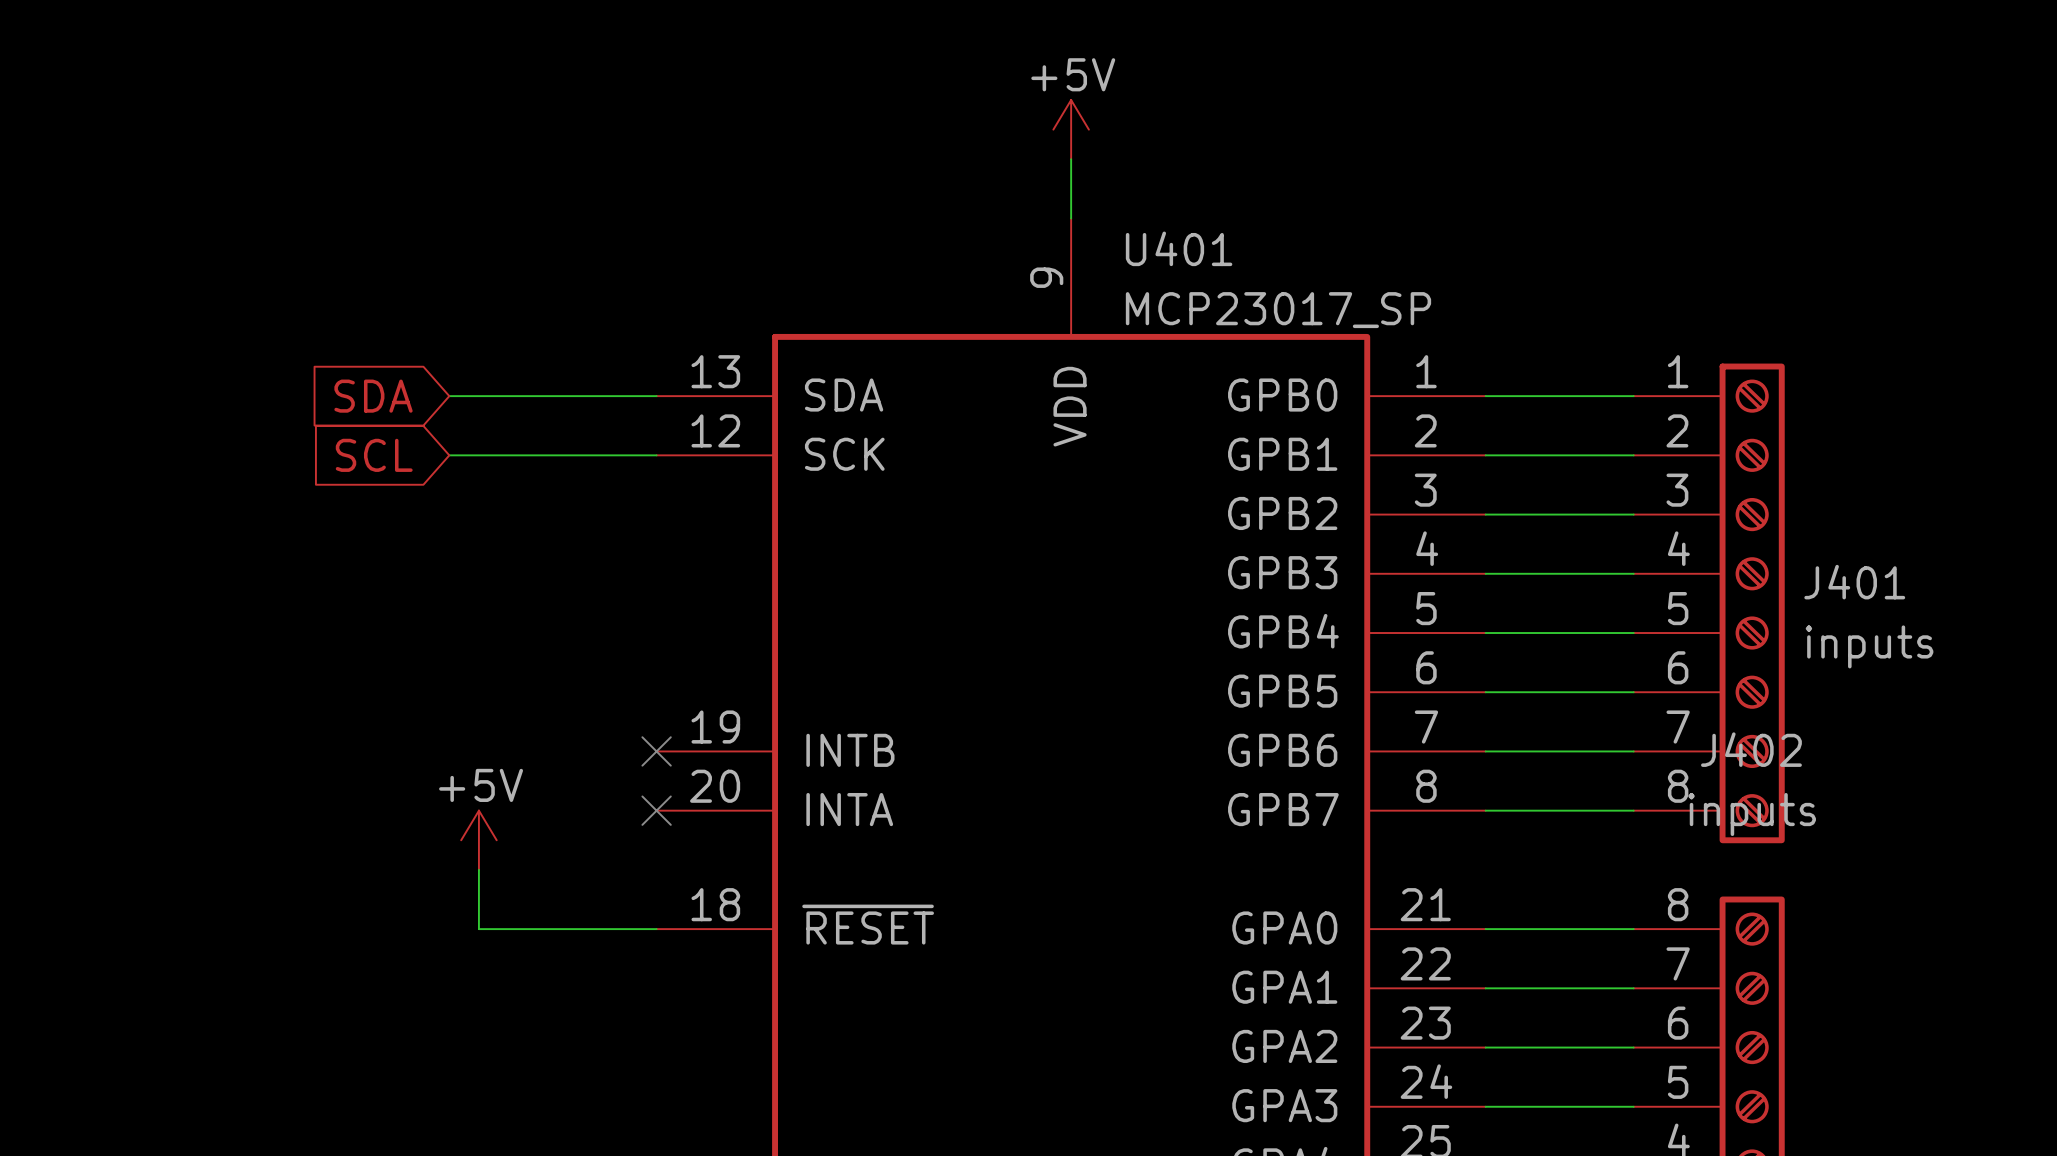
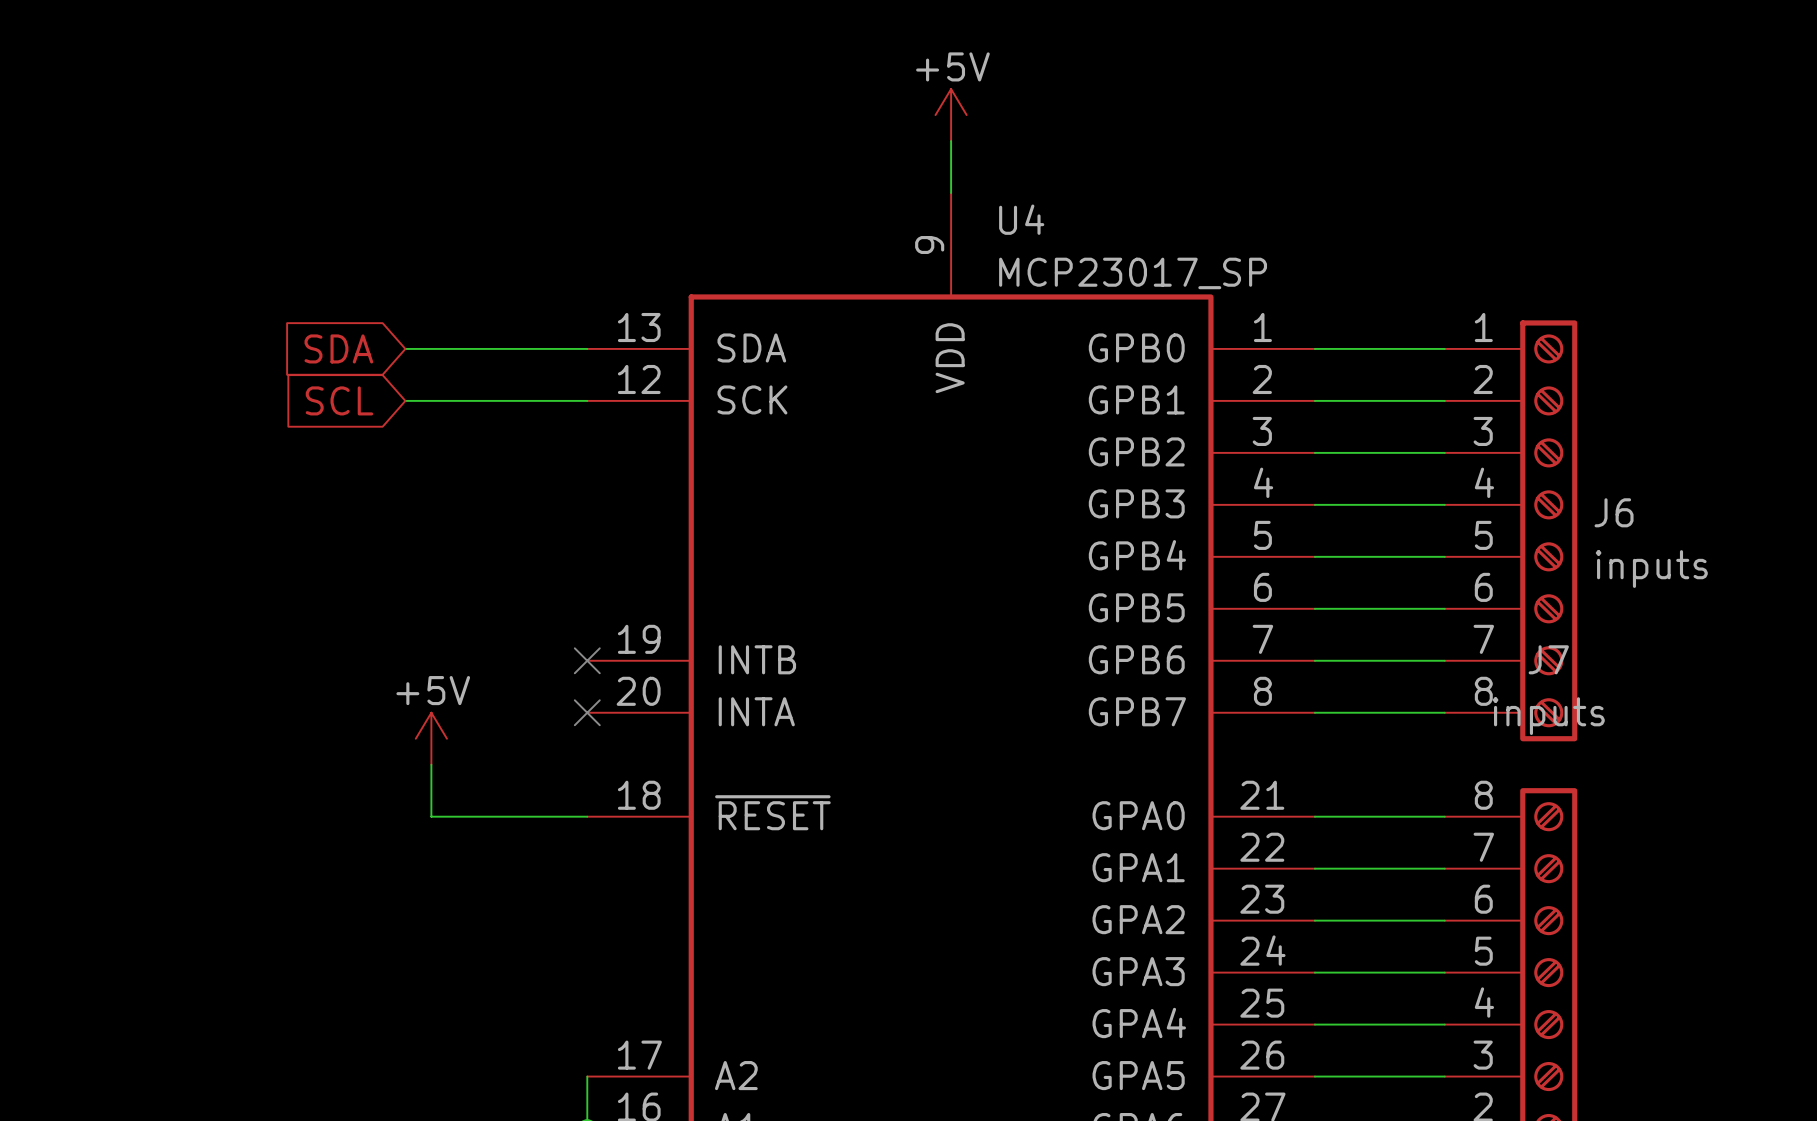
U401 name: U401 (1179, 248) -> U4 (1021, 219)
J401 name: J401 (1854, 582) -> J6 (1614, 512)
J402 name: J402 (1751, 749) -> J7 (1548, 659)

